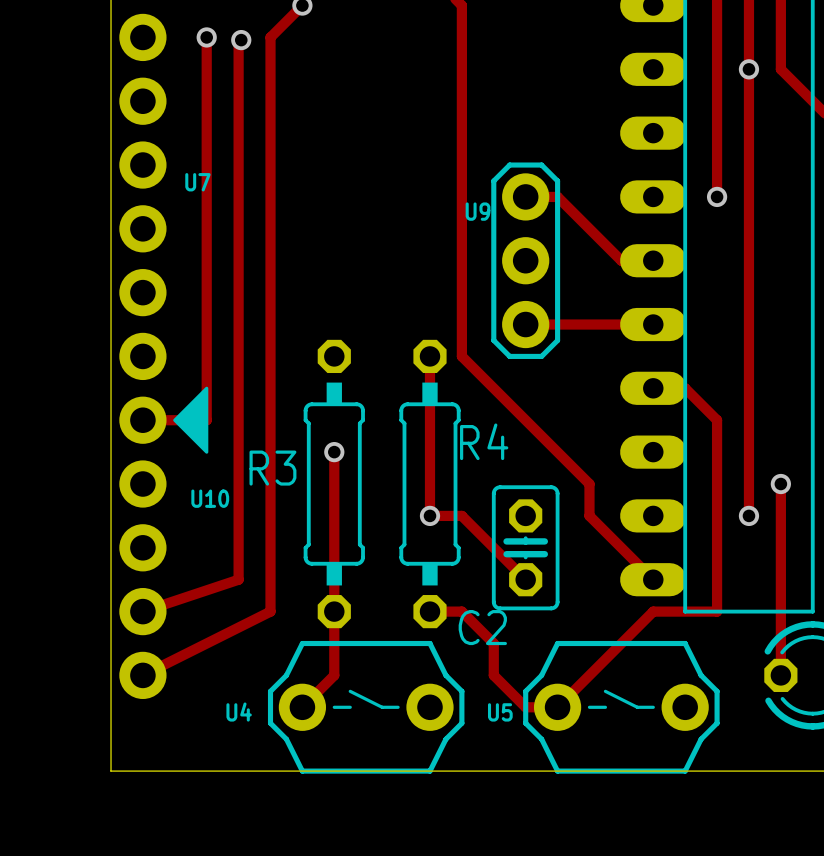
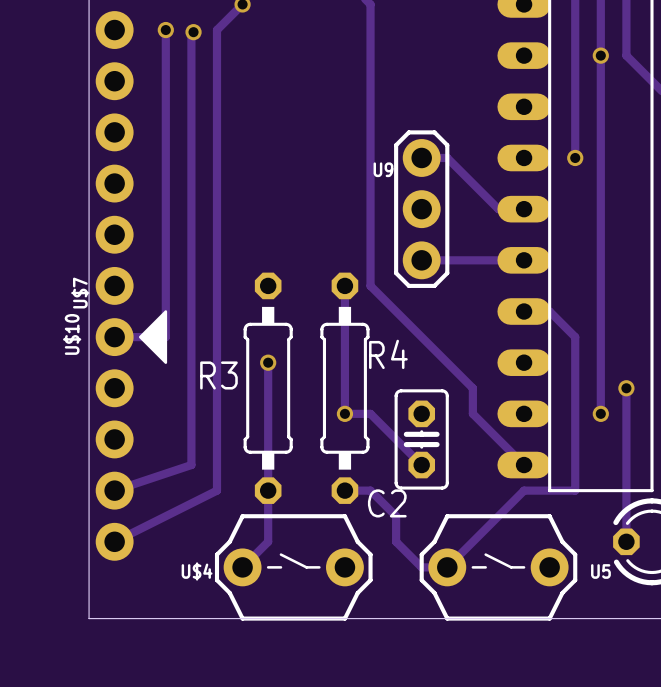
U7 name: U7 (197, 182) -> U$7 (80, 293)
U10 name: U10 (210, 498) -> U$10 (72, 334)
U4 name: U4 (239, 712) -> U$4 (197, 571)
U5 name position: U5 (500, 712) -> U5 (600, 571)

